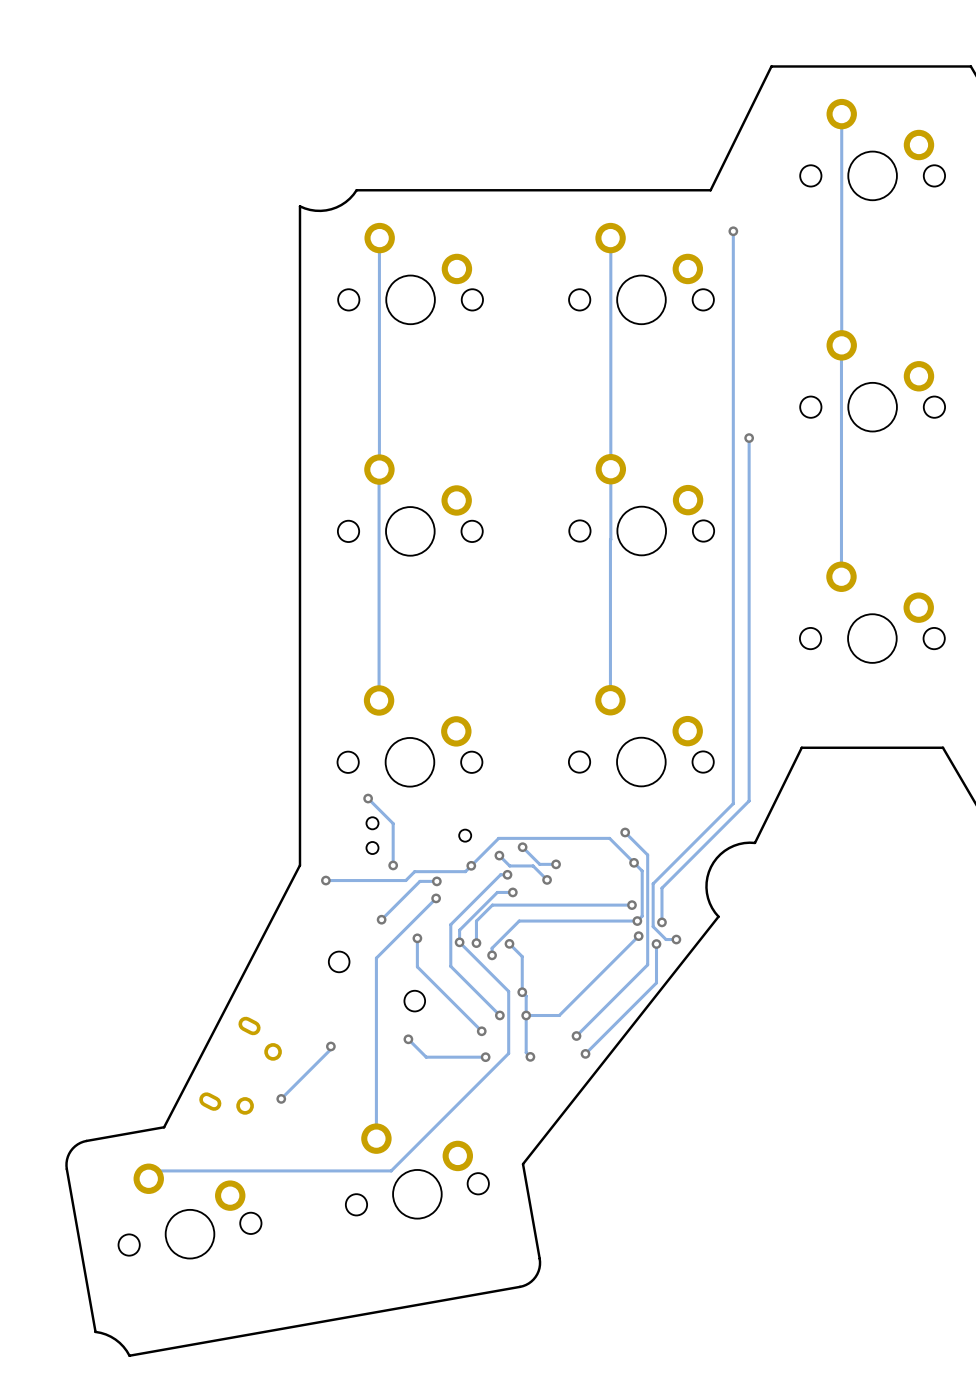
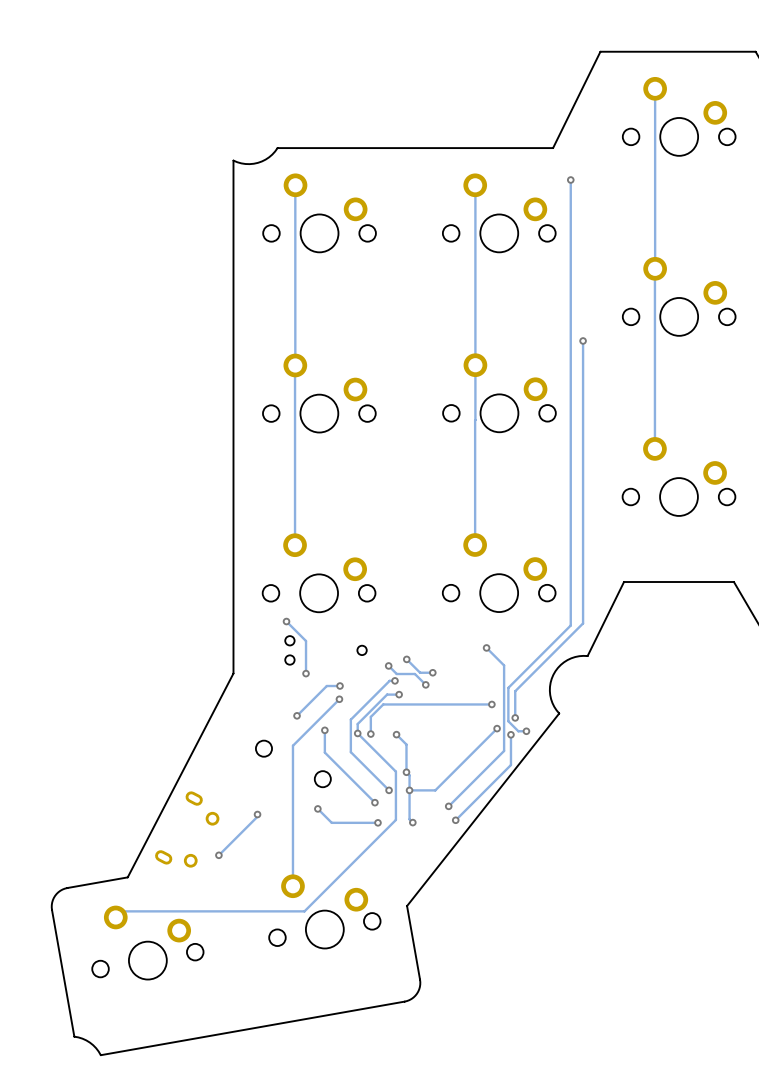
via: (634, 862) -> none
via: (471, 865) -> none
track: (325, 880) (405, 880) (414, 871) (465, 871) (498, 838) (609, 838) (642, 870) (642, 916) (637, 921) (519, 921) (492, 948) (492, 955) -> none
via: (325, 880) -> none
via: (637, 921) -> none
via: (492, 955) -> none

